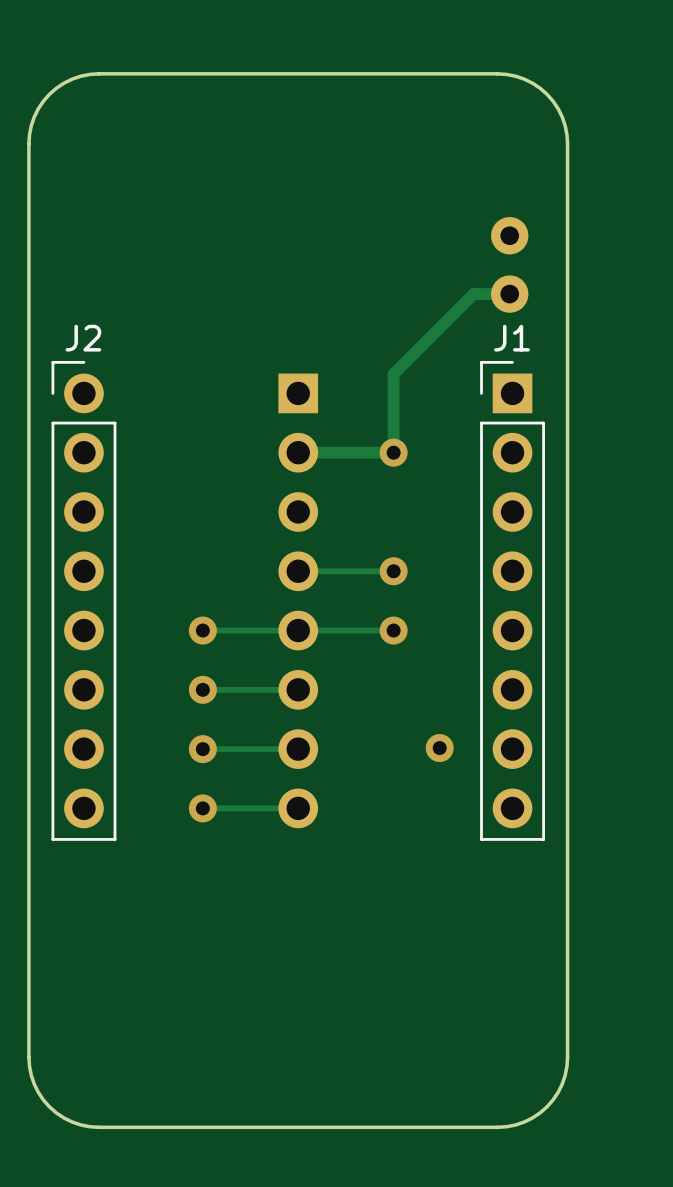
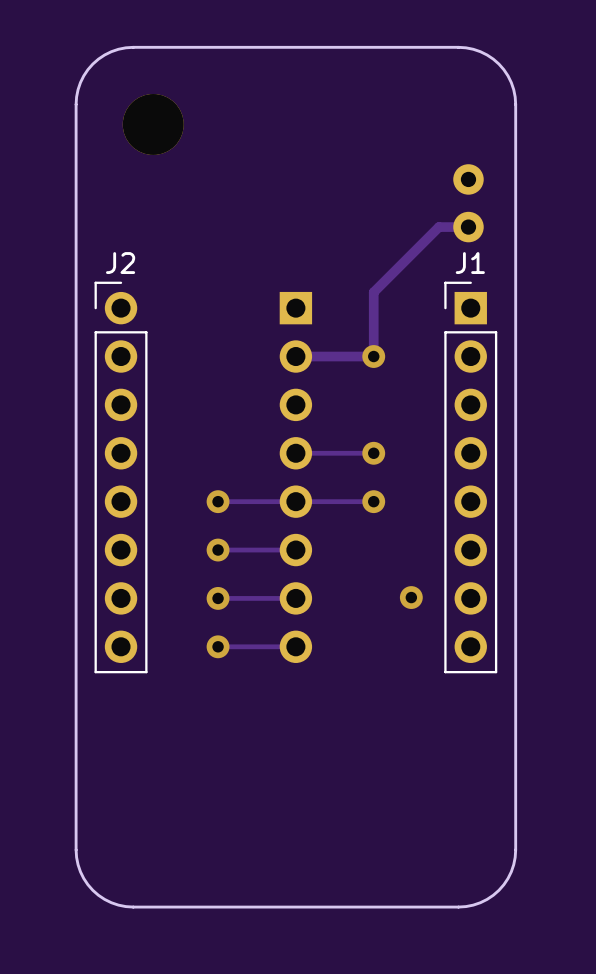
part: none -> (153, 124)

